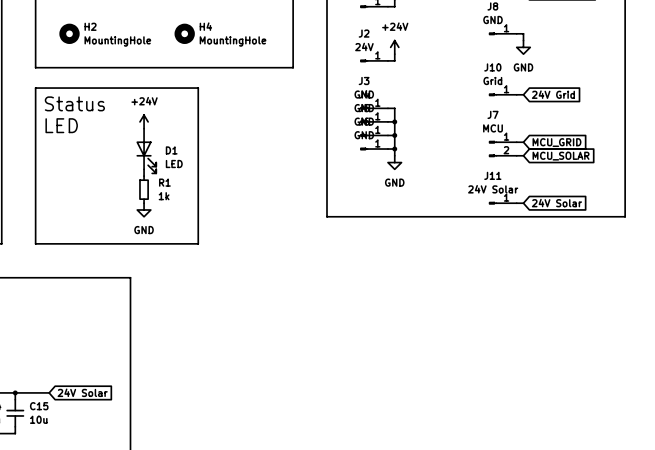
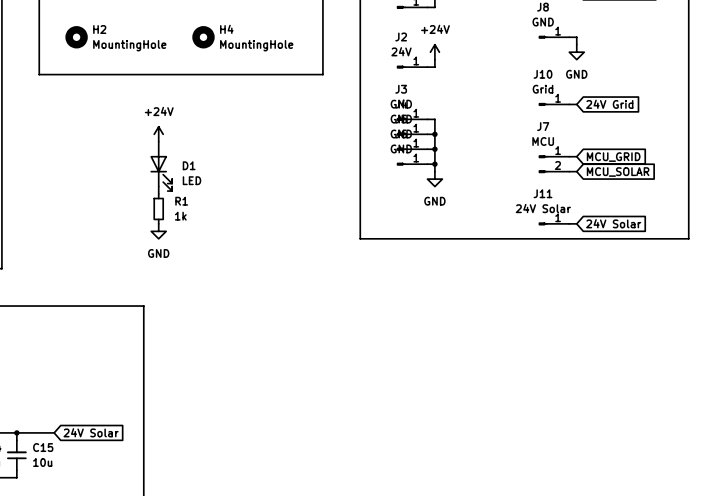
line: (35, 88) (198, 88) (198, 243) (35, 243) (35, 88) -> none
text: Status (74, 103) -> none
text: LED (61, 125) -> none

